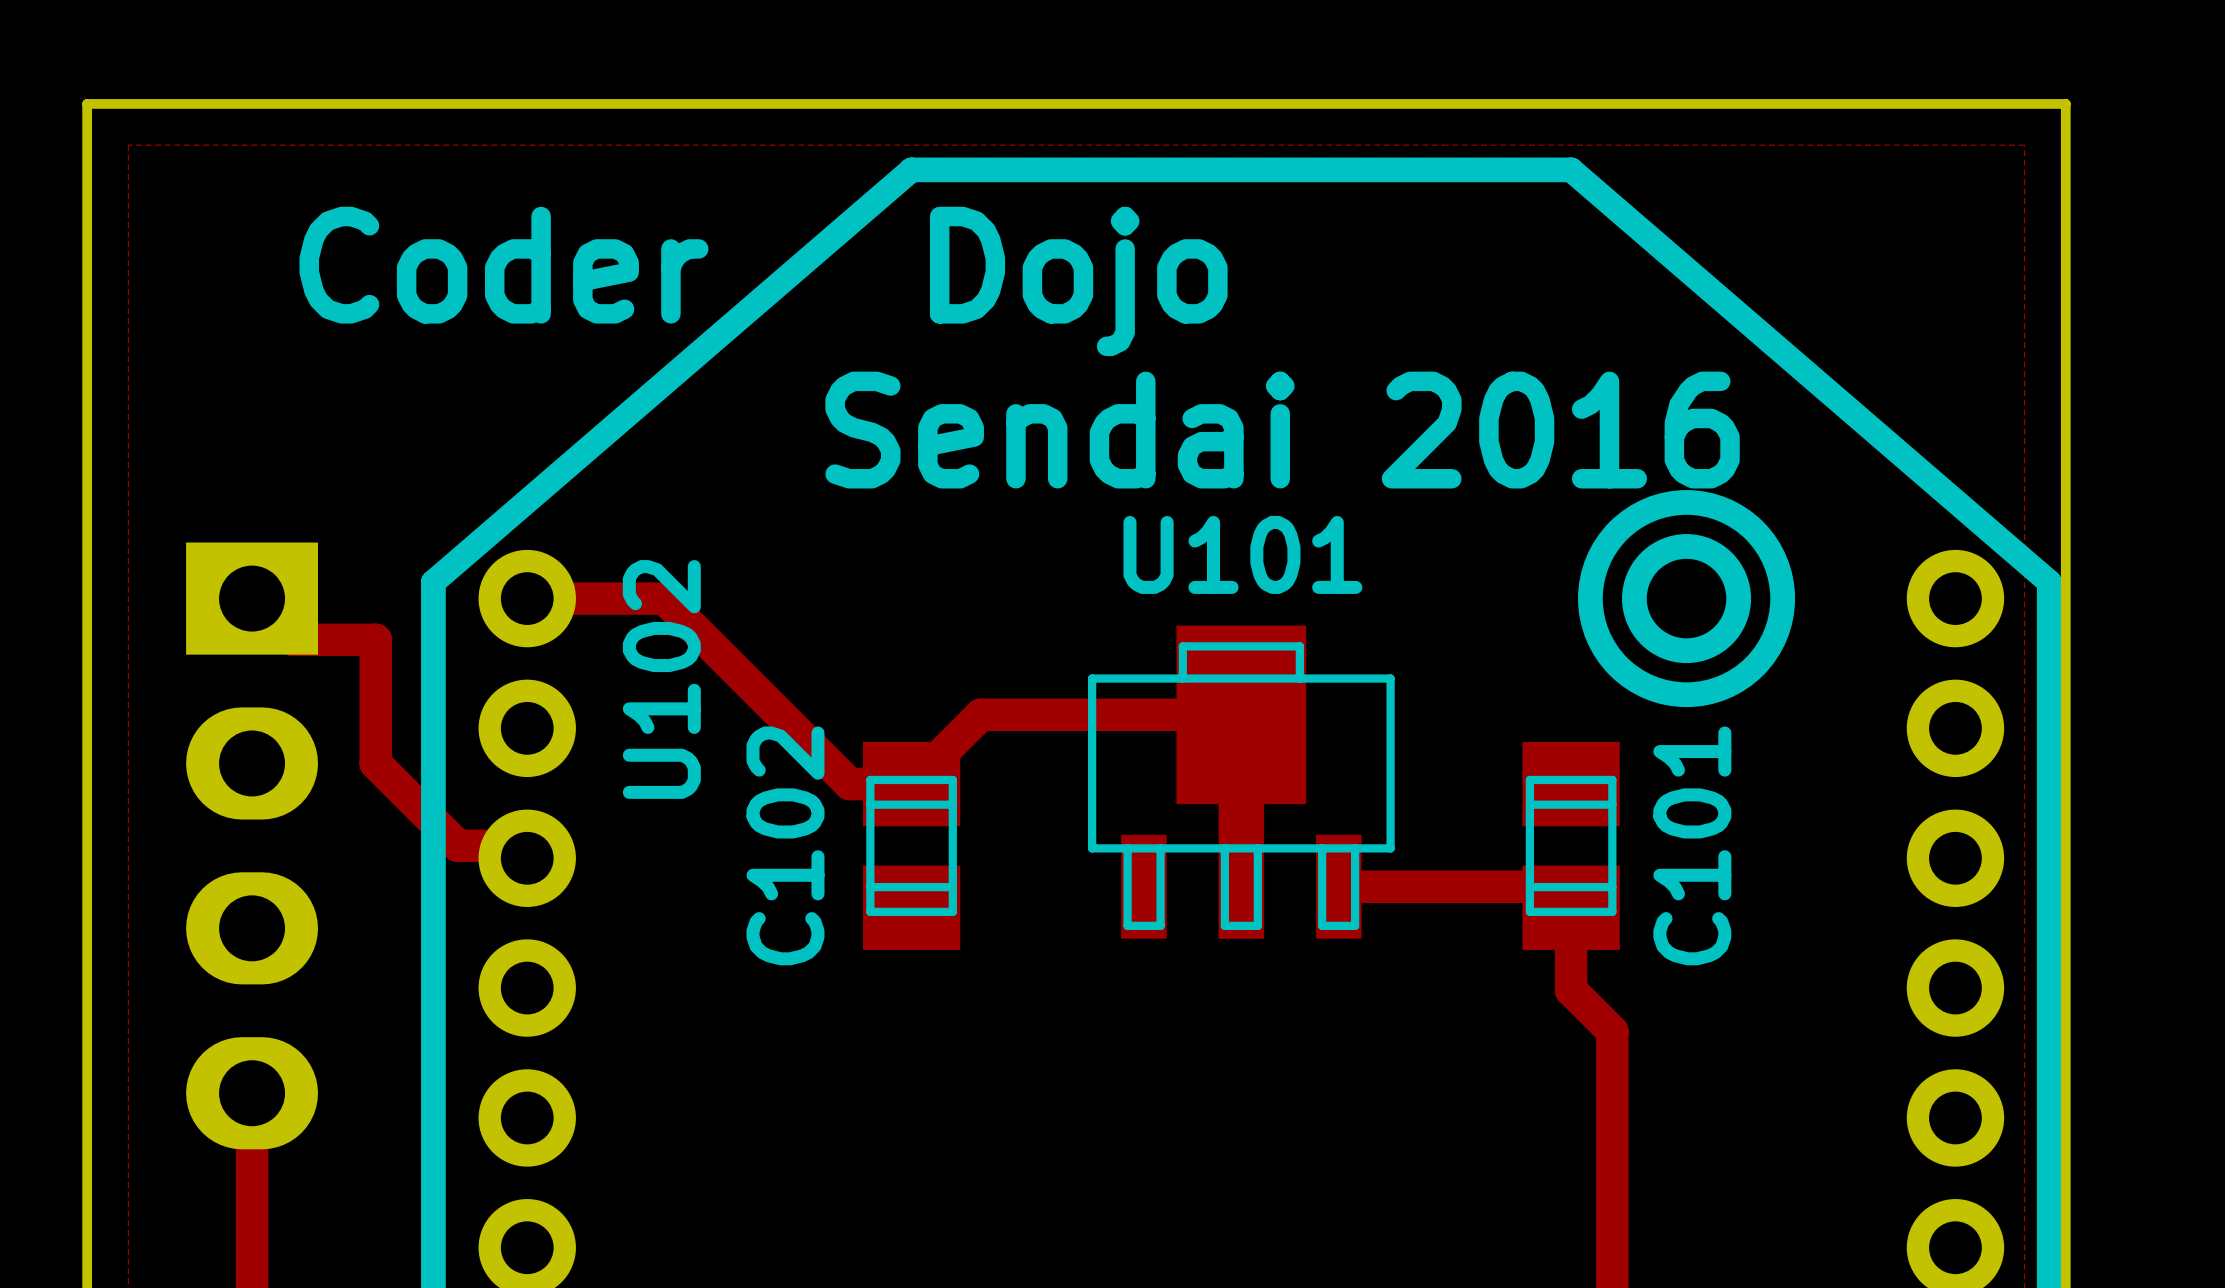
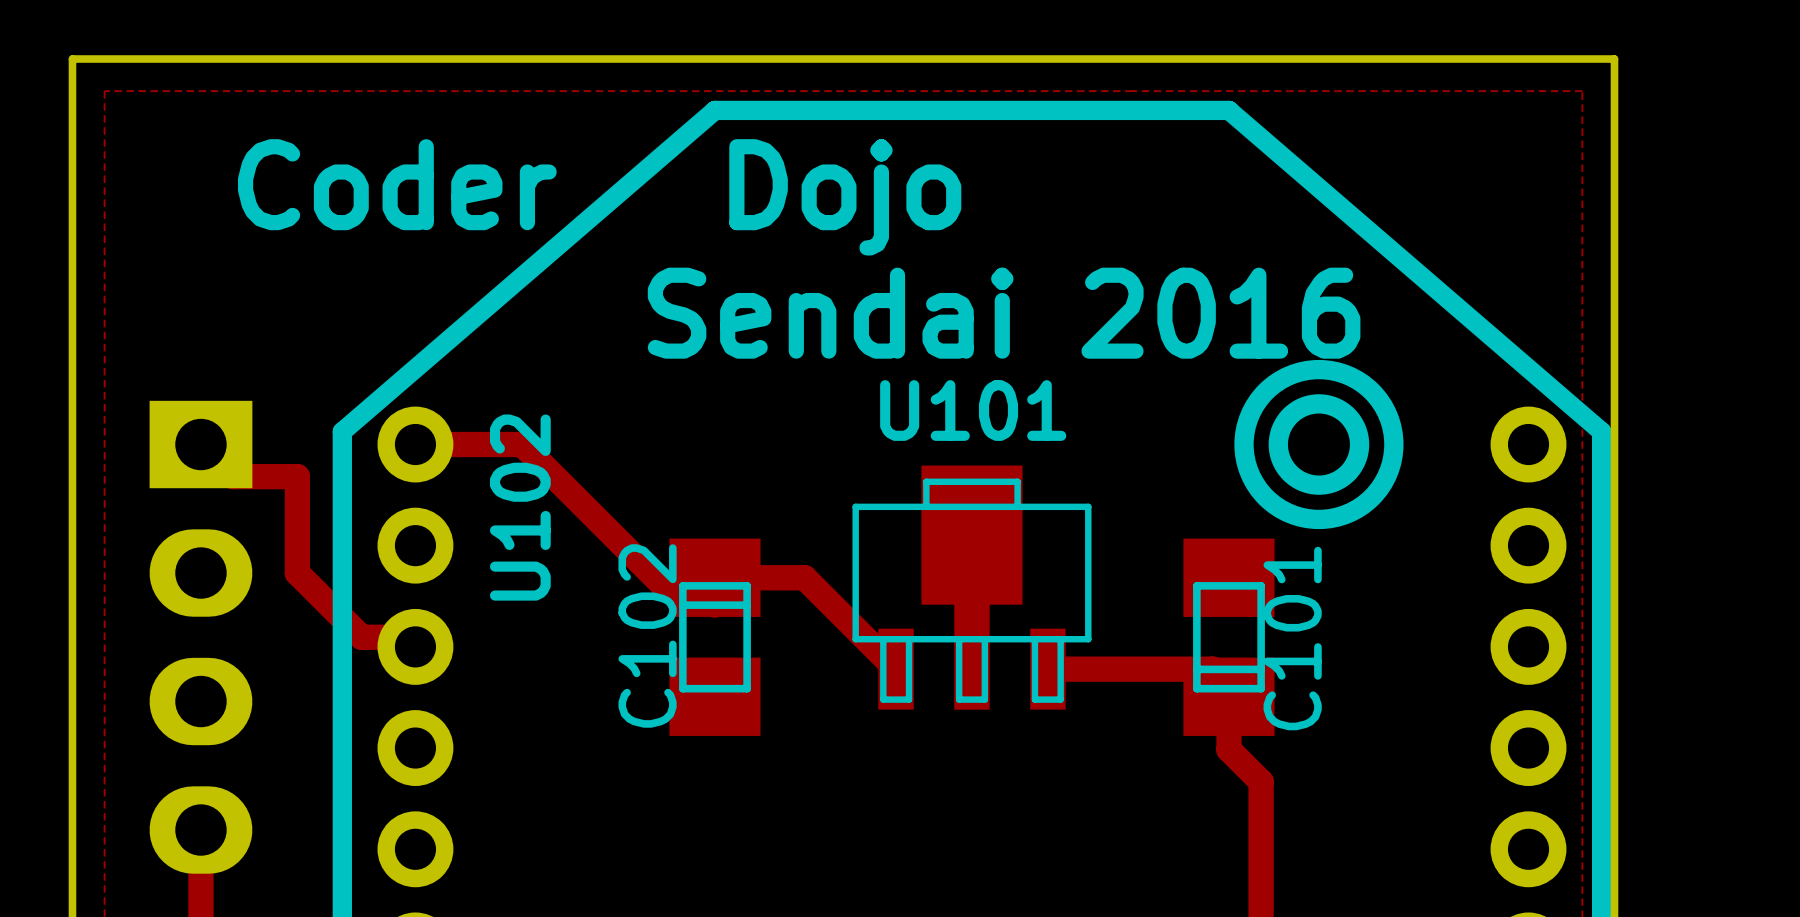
track: (1241, 714) (980, 714) (911, 784) -> none
C102 footprint: [862, 741, 961, 950] -> [669, 538, 761, 736]
C101 footprint: [1522, 741, 1620, 950] -> [1183, 538, 1275, 736]
track: none -> (714, 577) (804, 577) (896, 669)
C102 name position: C102 (785, 845) -> C102 (647, 635)
C101 name position: C101 (1692, 845) -> C101 (1292, 638)

